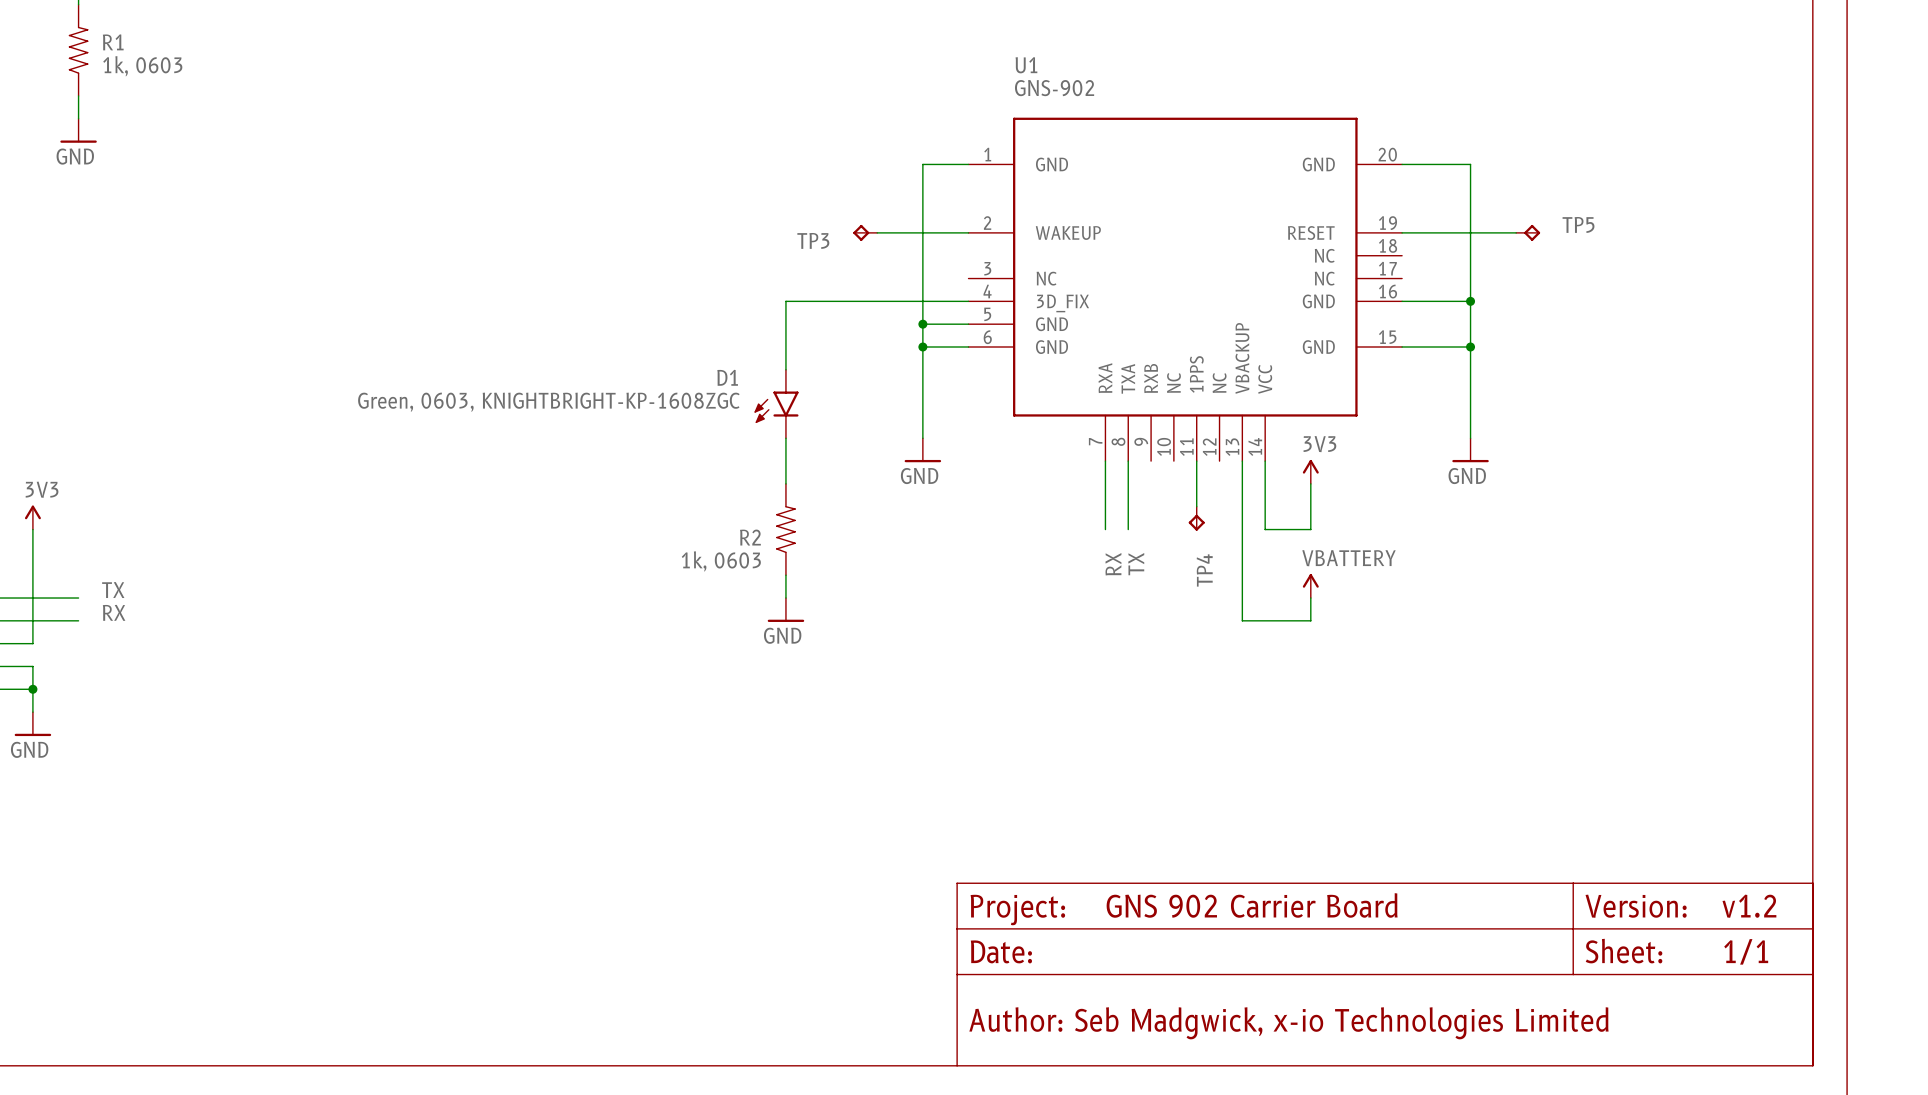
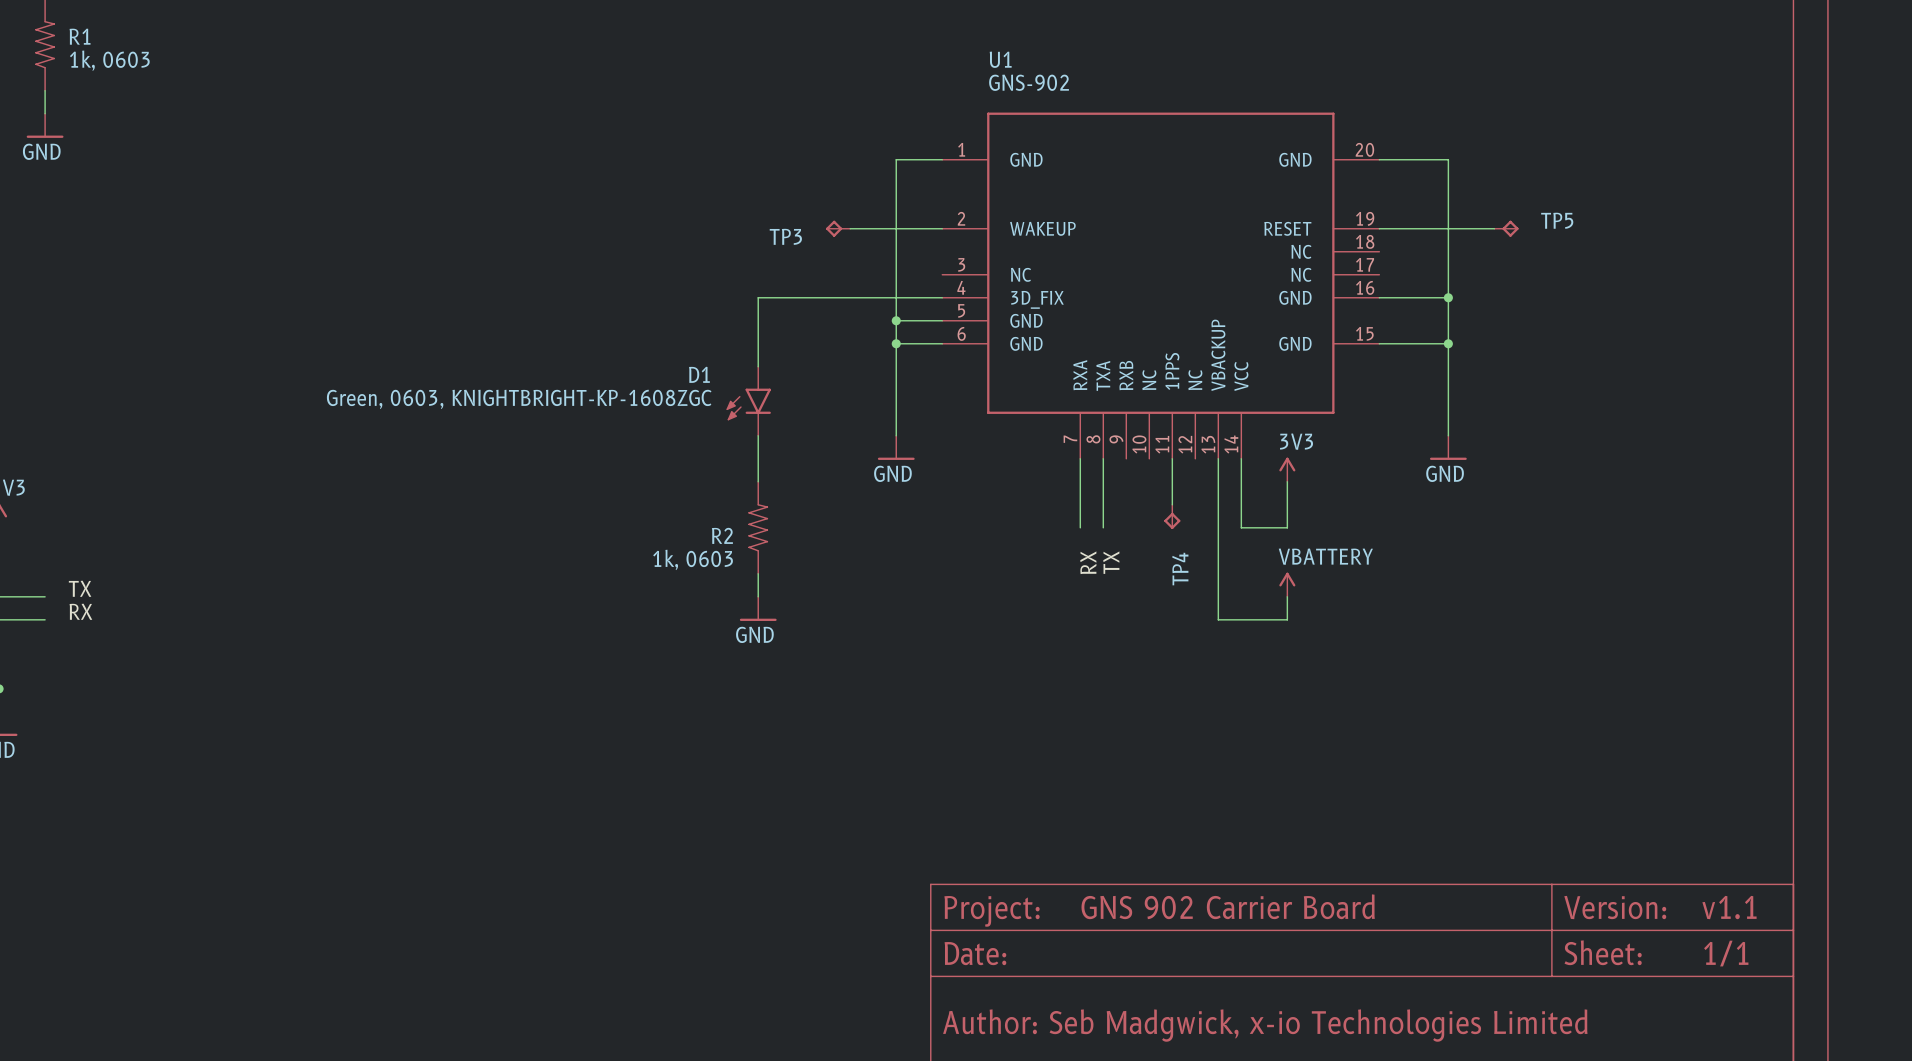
text: v1.2 (1749, 906) -> v1.1 (1729, 907)

